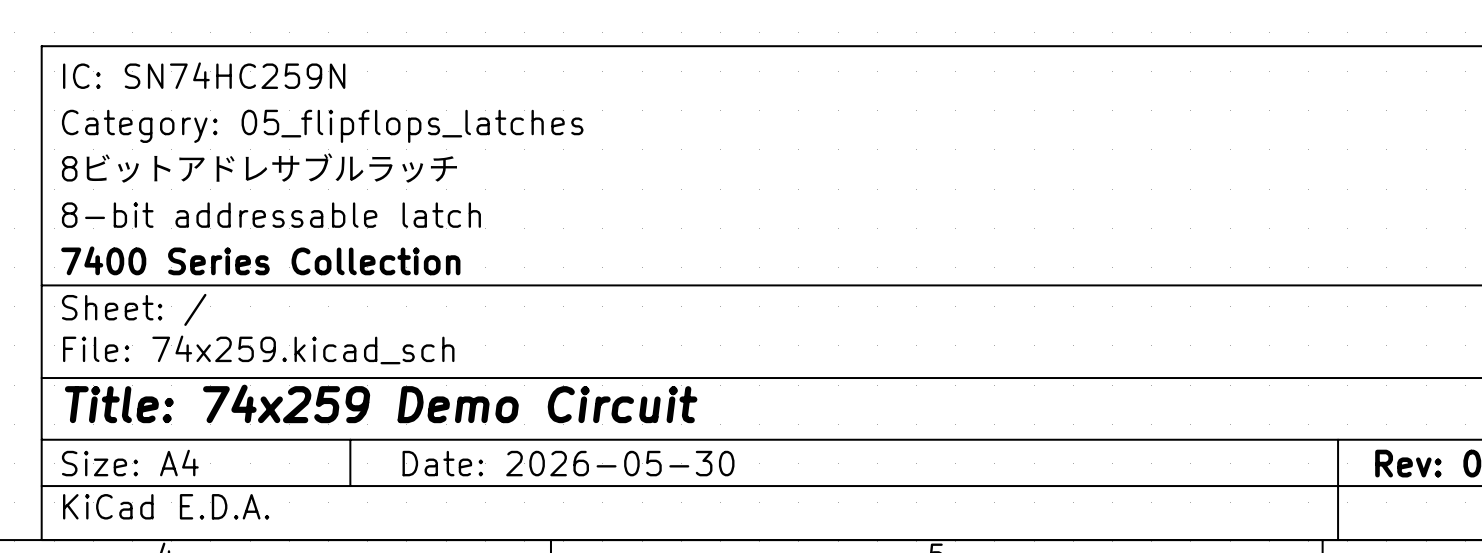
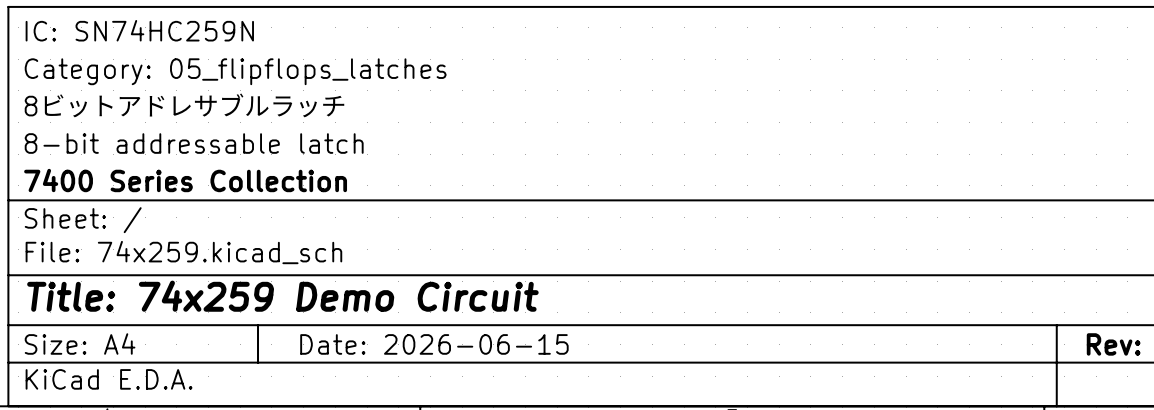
title block: Date: 2026-05-30 (568, 463) -> Date: 2026-06-15 (434, 344)

